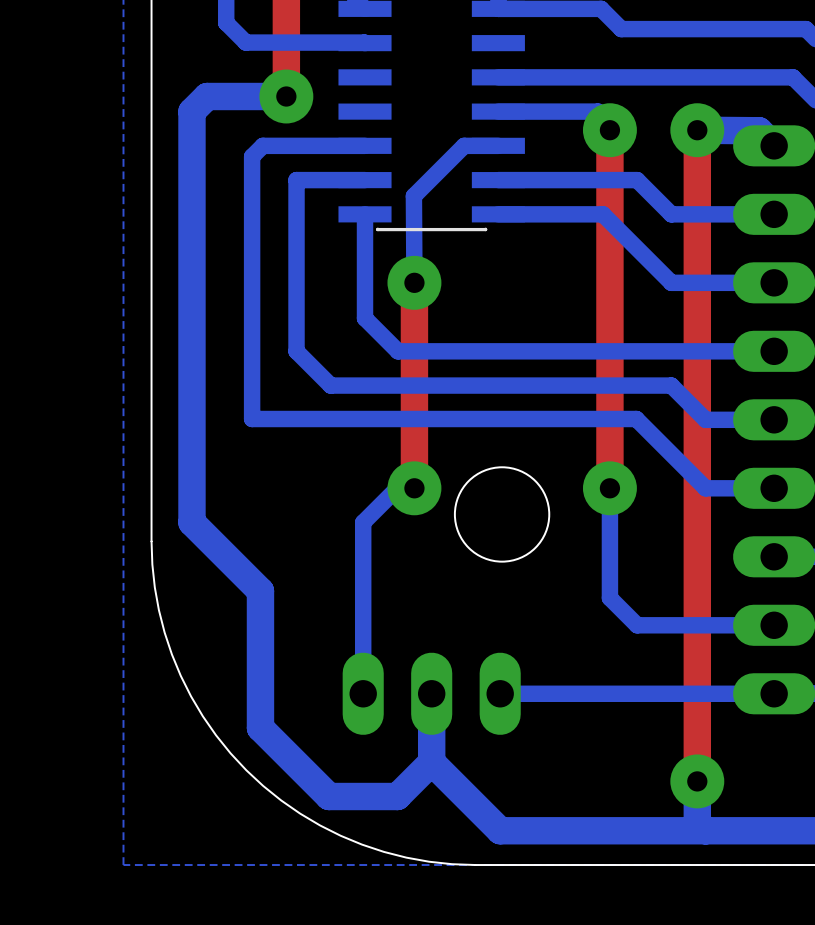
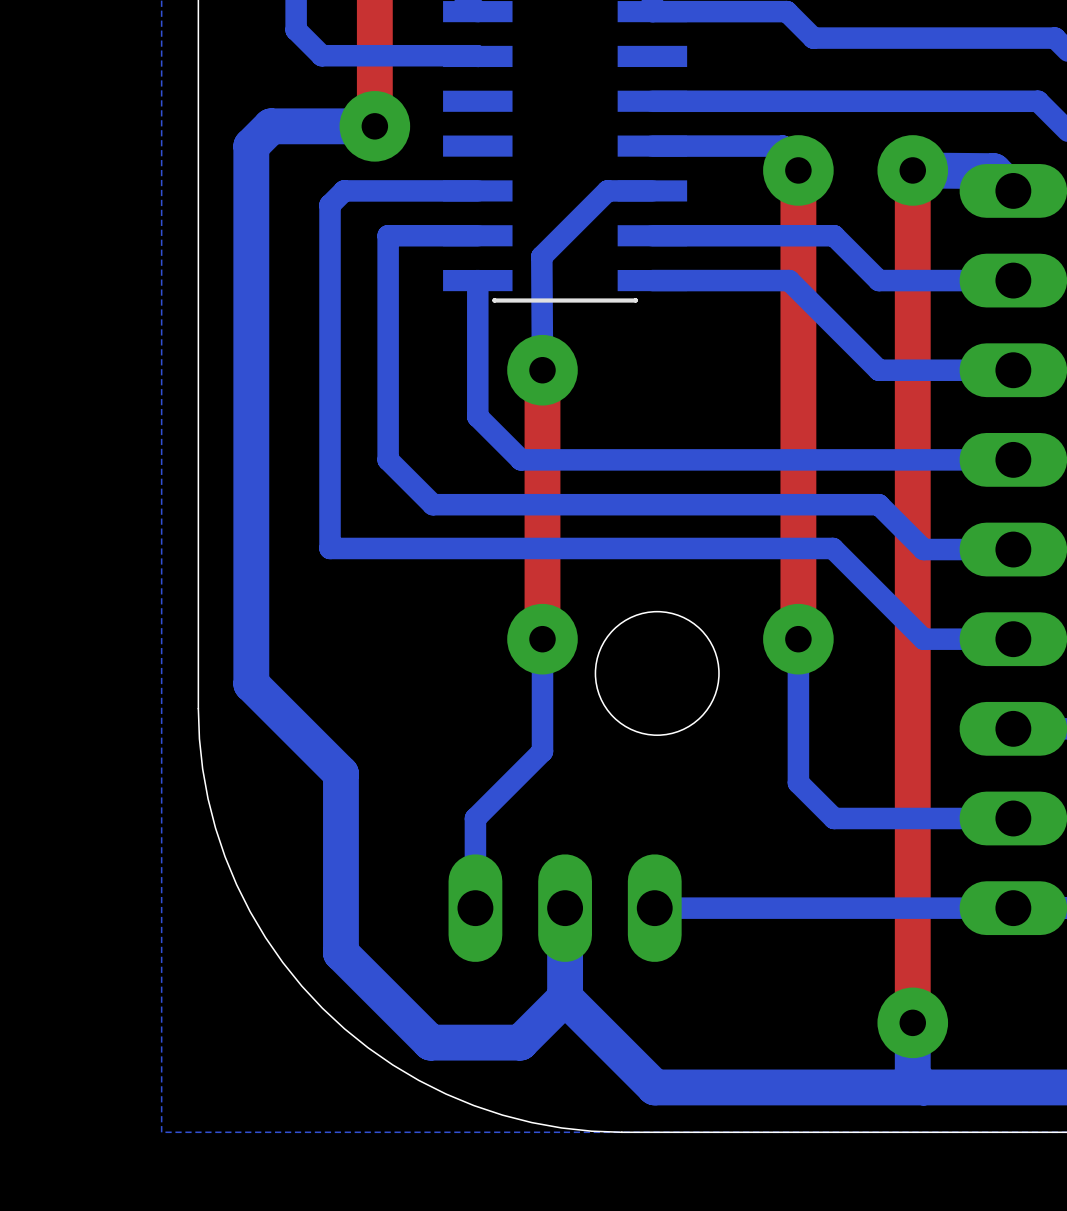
bottom track: (414, 488) (397, 488) (363, 522) (363, 625) -> (542, 639) (542, 751) (475, 818)

